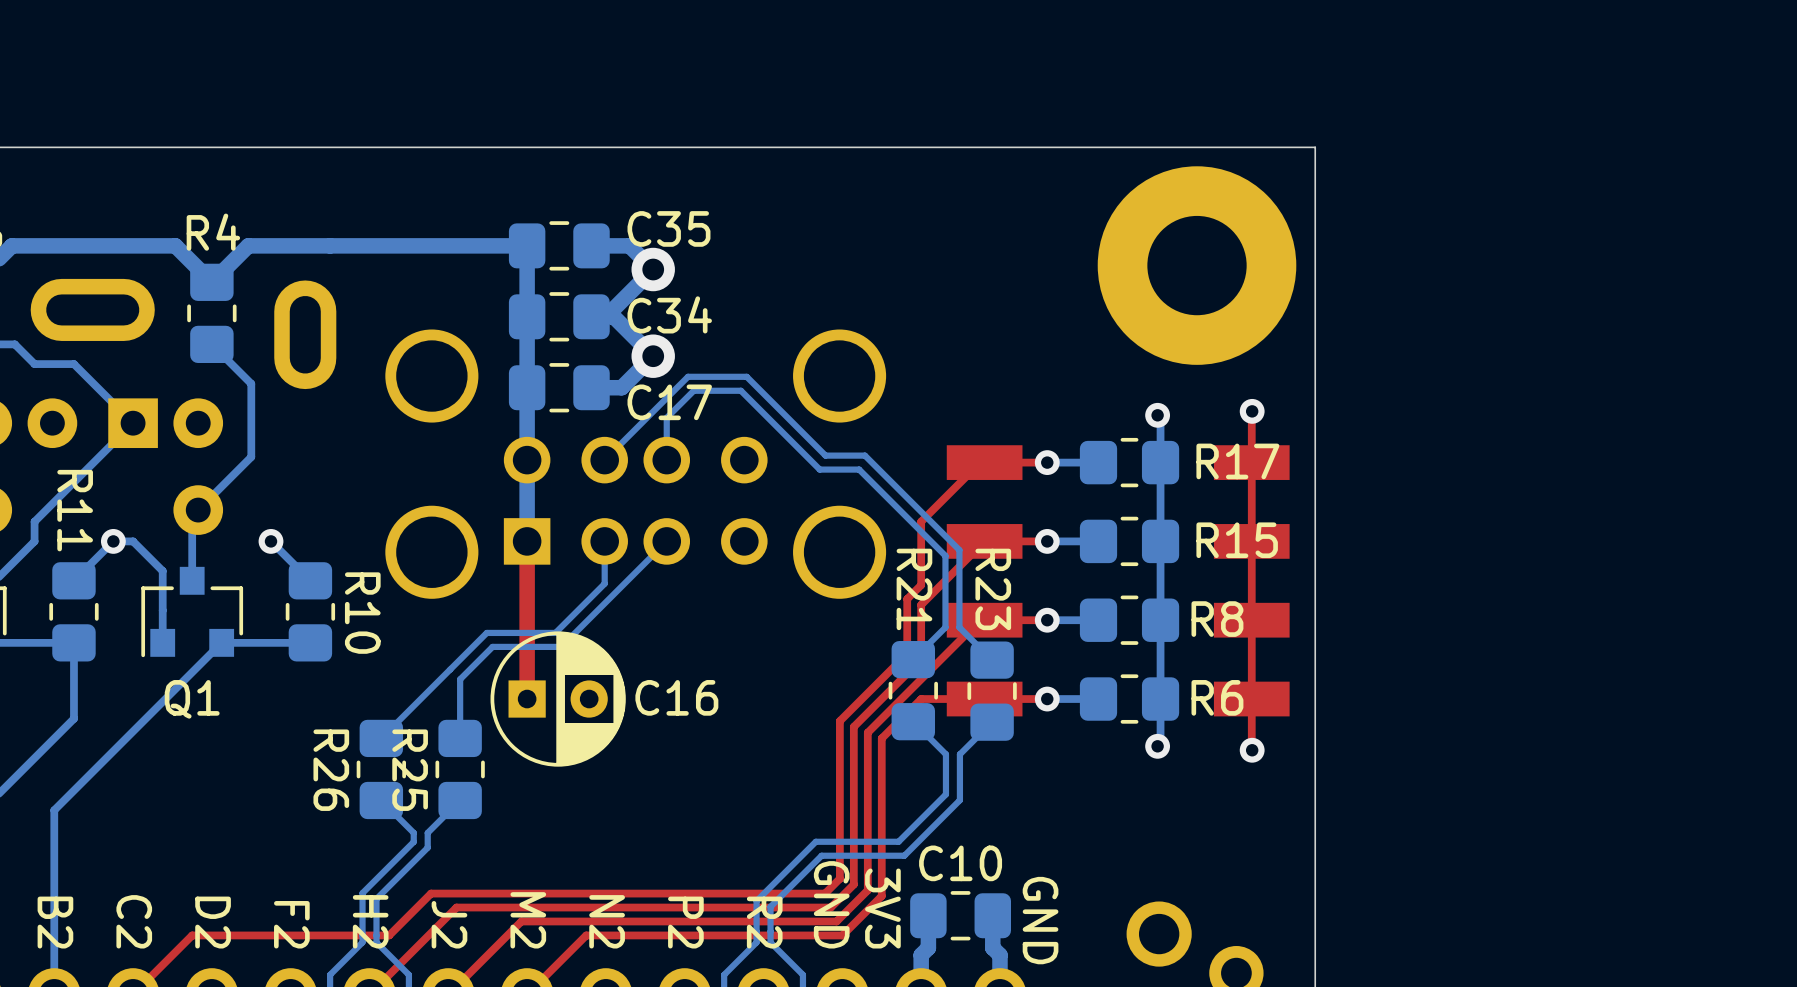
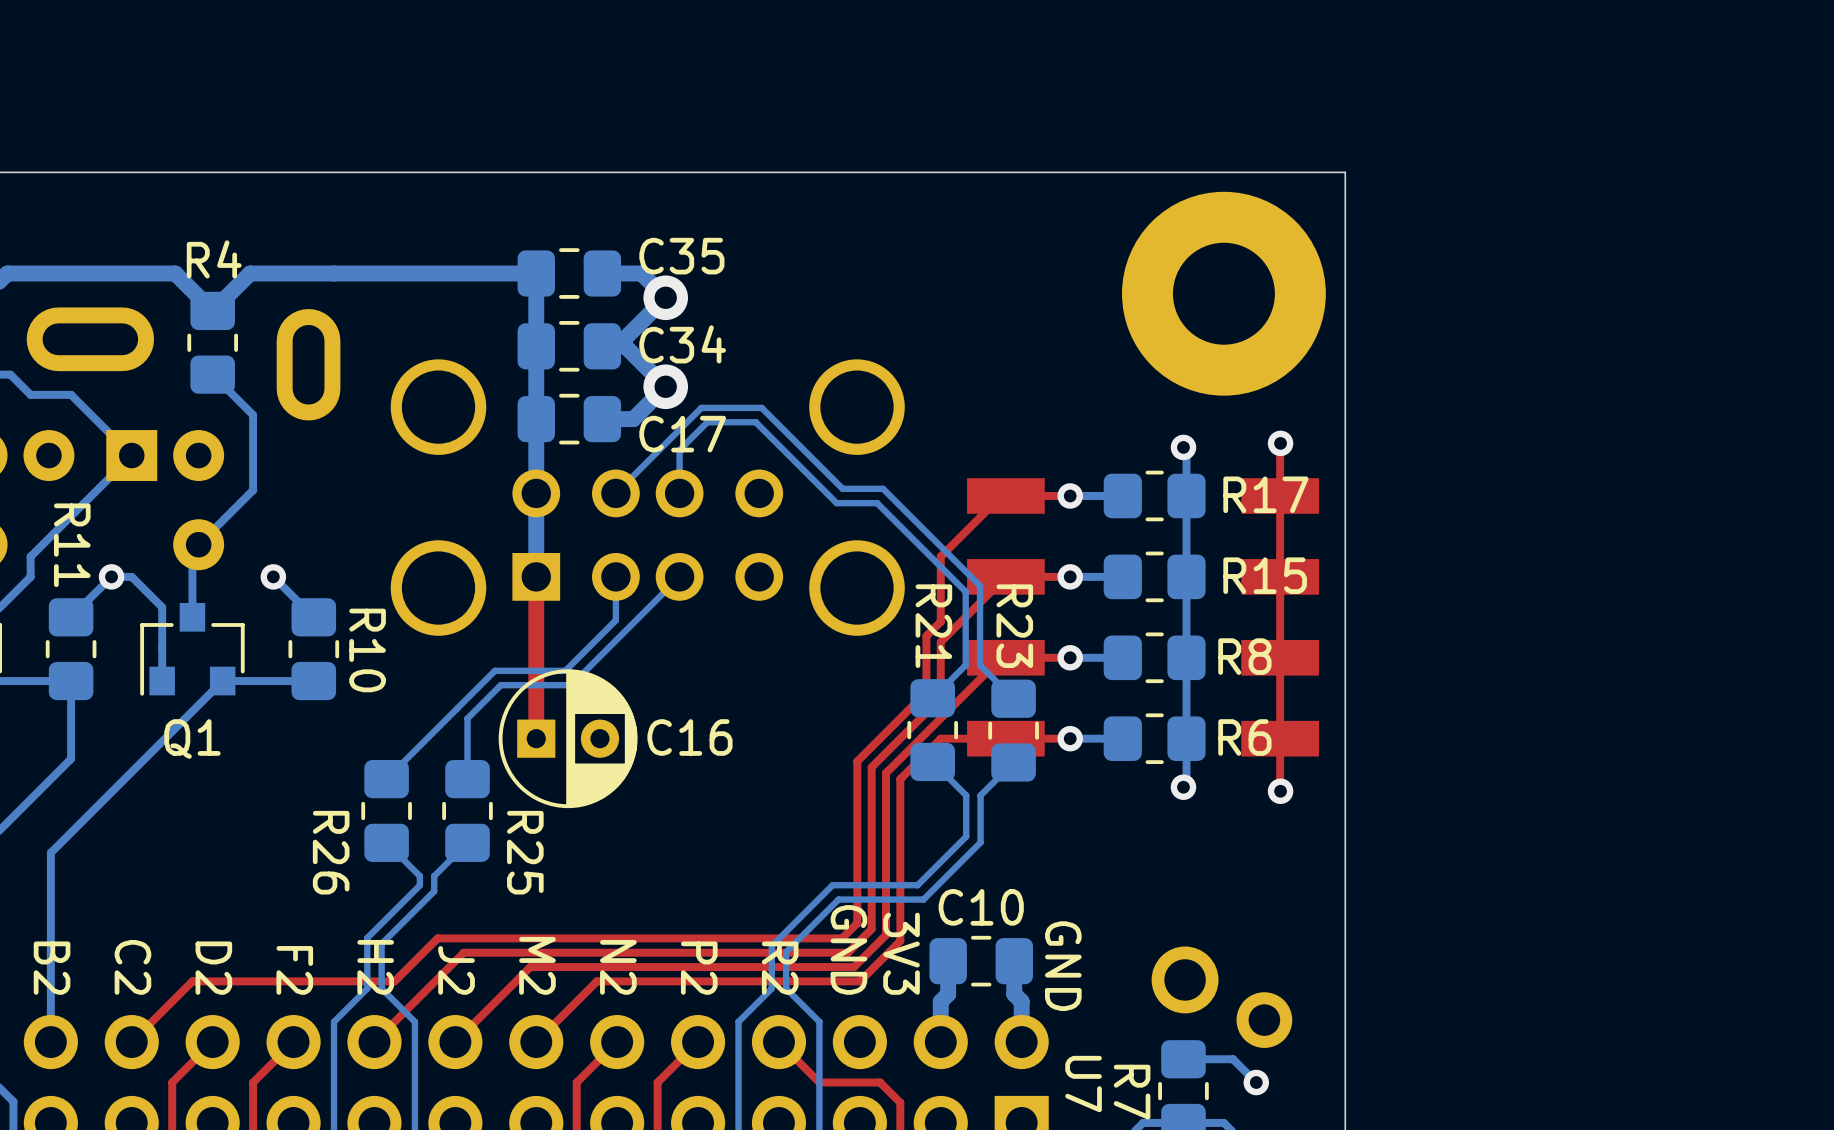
R26 name position: R26 (331, 770) -> R26 (331, 852)
R25 name position: R25 (410, 770) -> R25 (525, 852)

